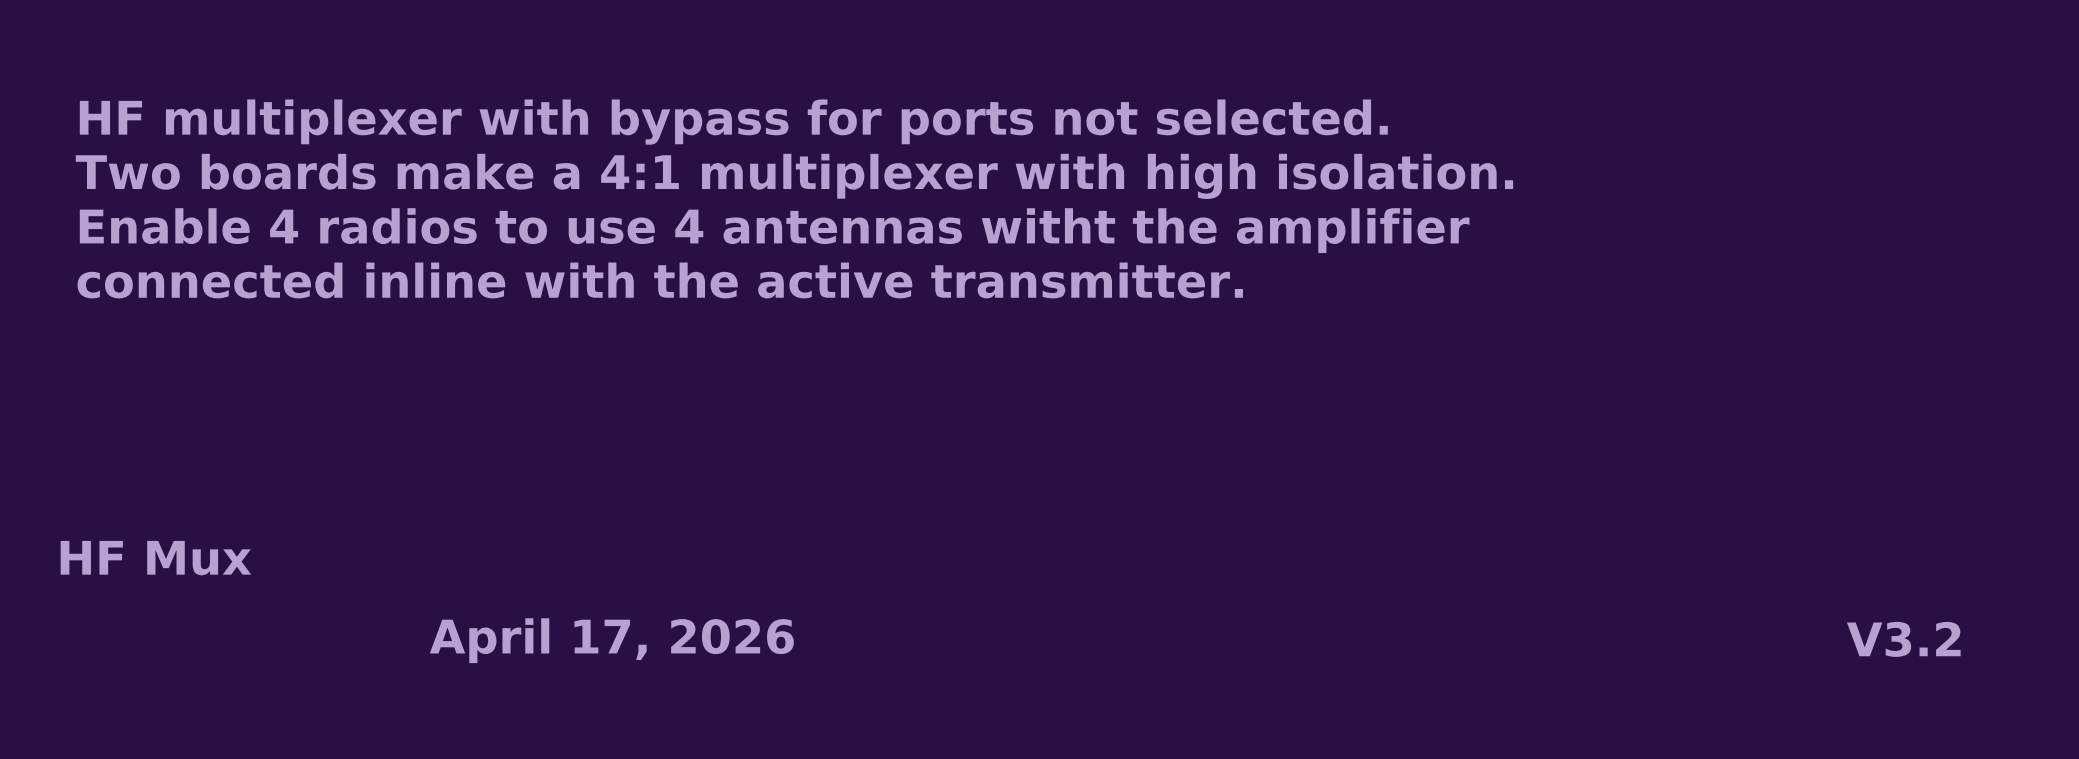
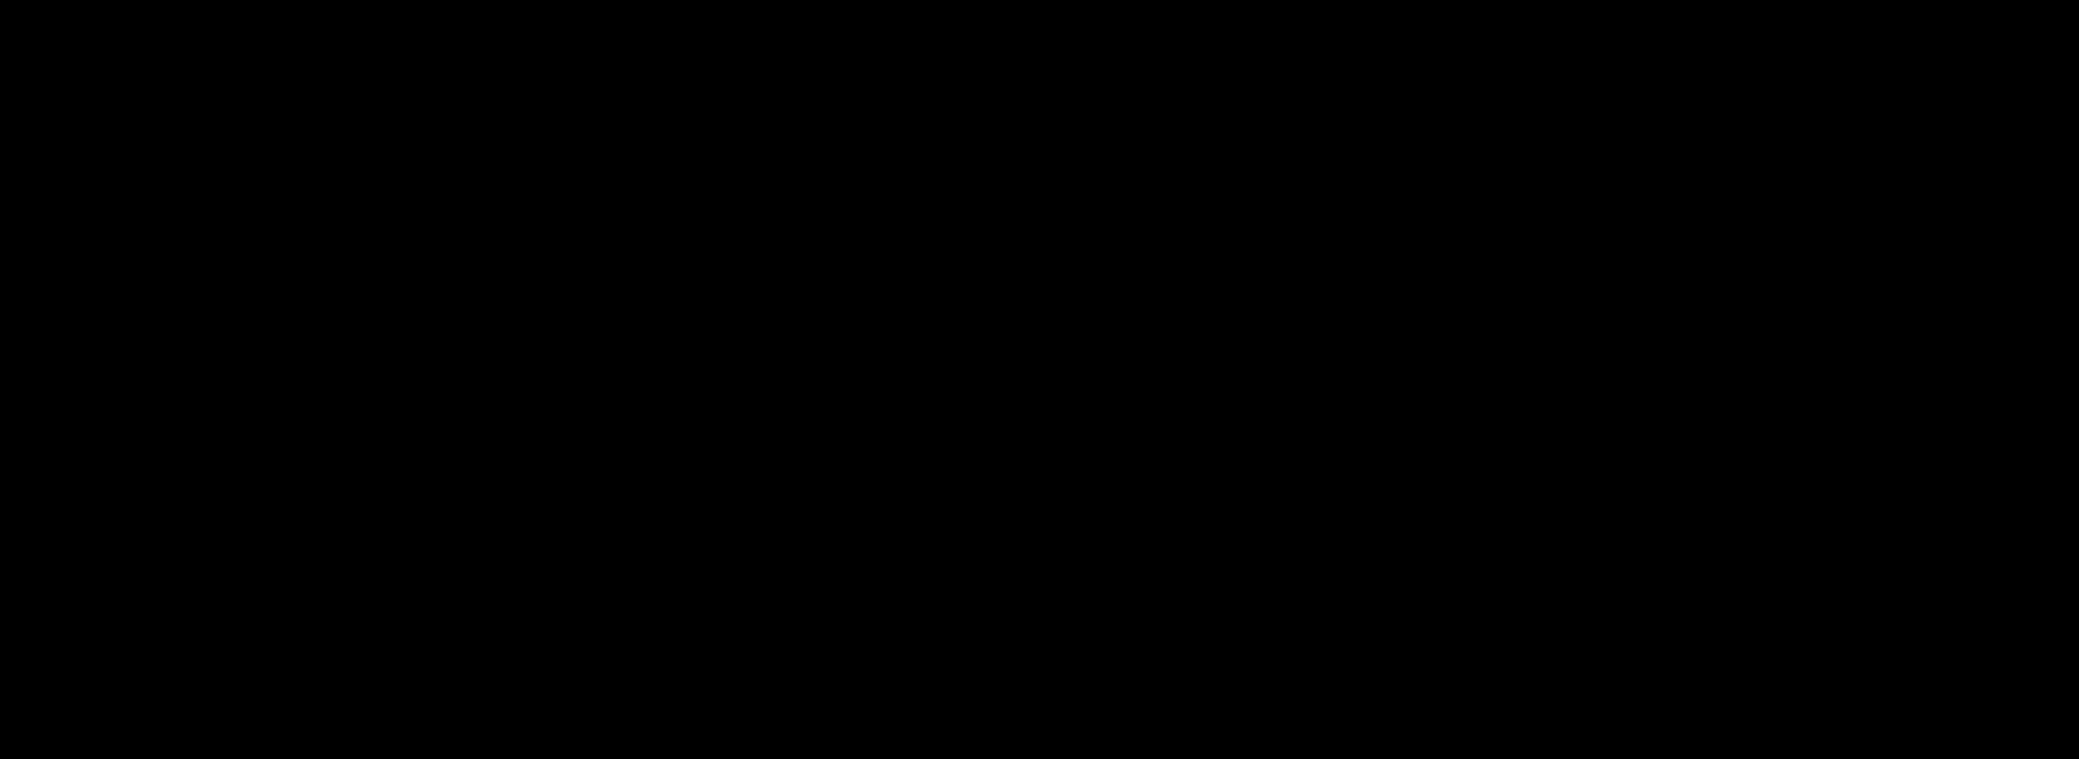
text: HF multiplexer with bypass for ports not selected. (733, 122) -> none
text: Two boards make a 4:1 multiplexer with high isolation. (794, 176) -> none
text: Enable 4 radios to use 4 antennas witht the amplifier (774, 230) -> none
text: connected inline with the active transmitter. (660, 280) -> none
text: HF Mux (155, 558) -> none
text: V3.2 (1903, 639) -> none
text: April 17, 2026 (611, 640) -> none

